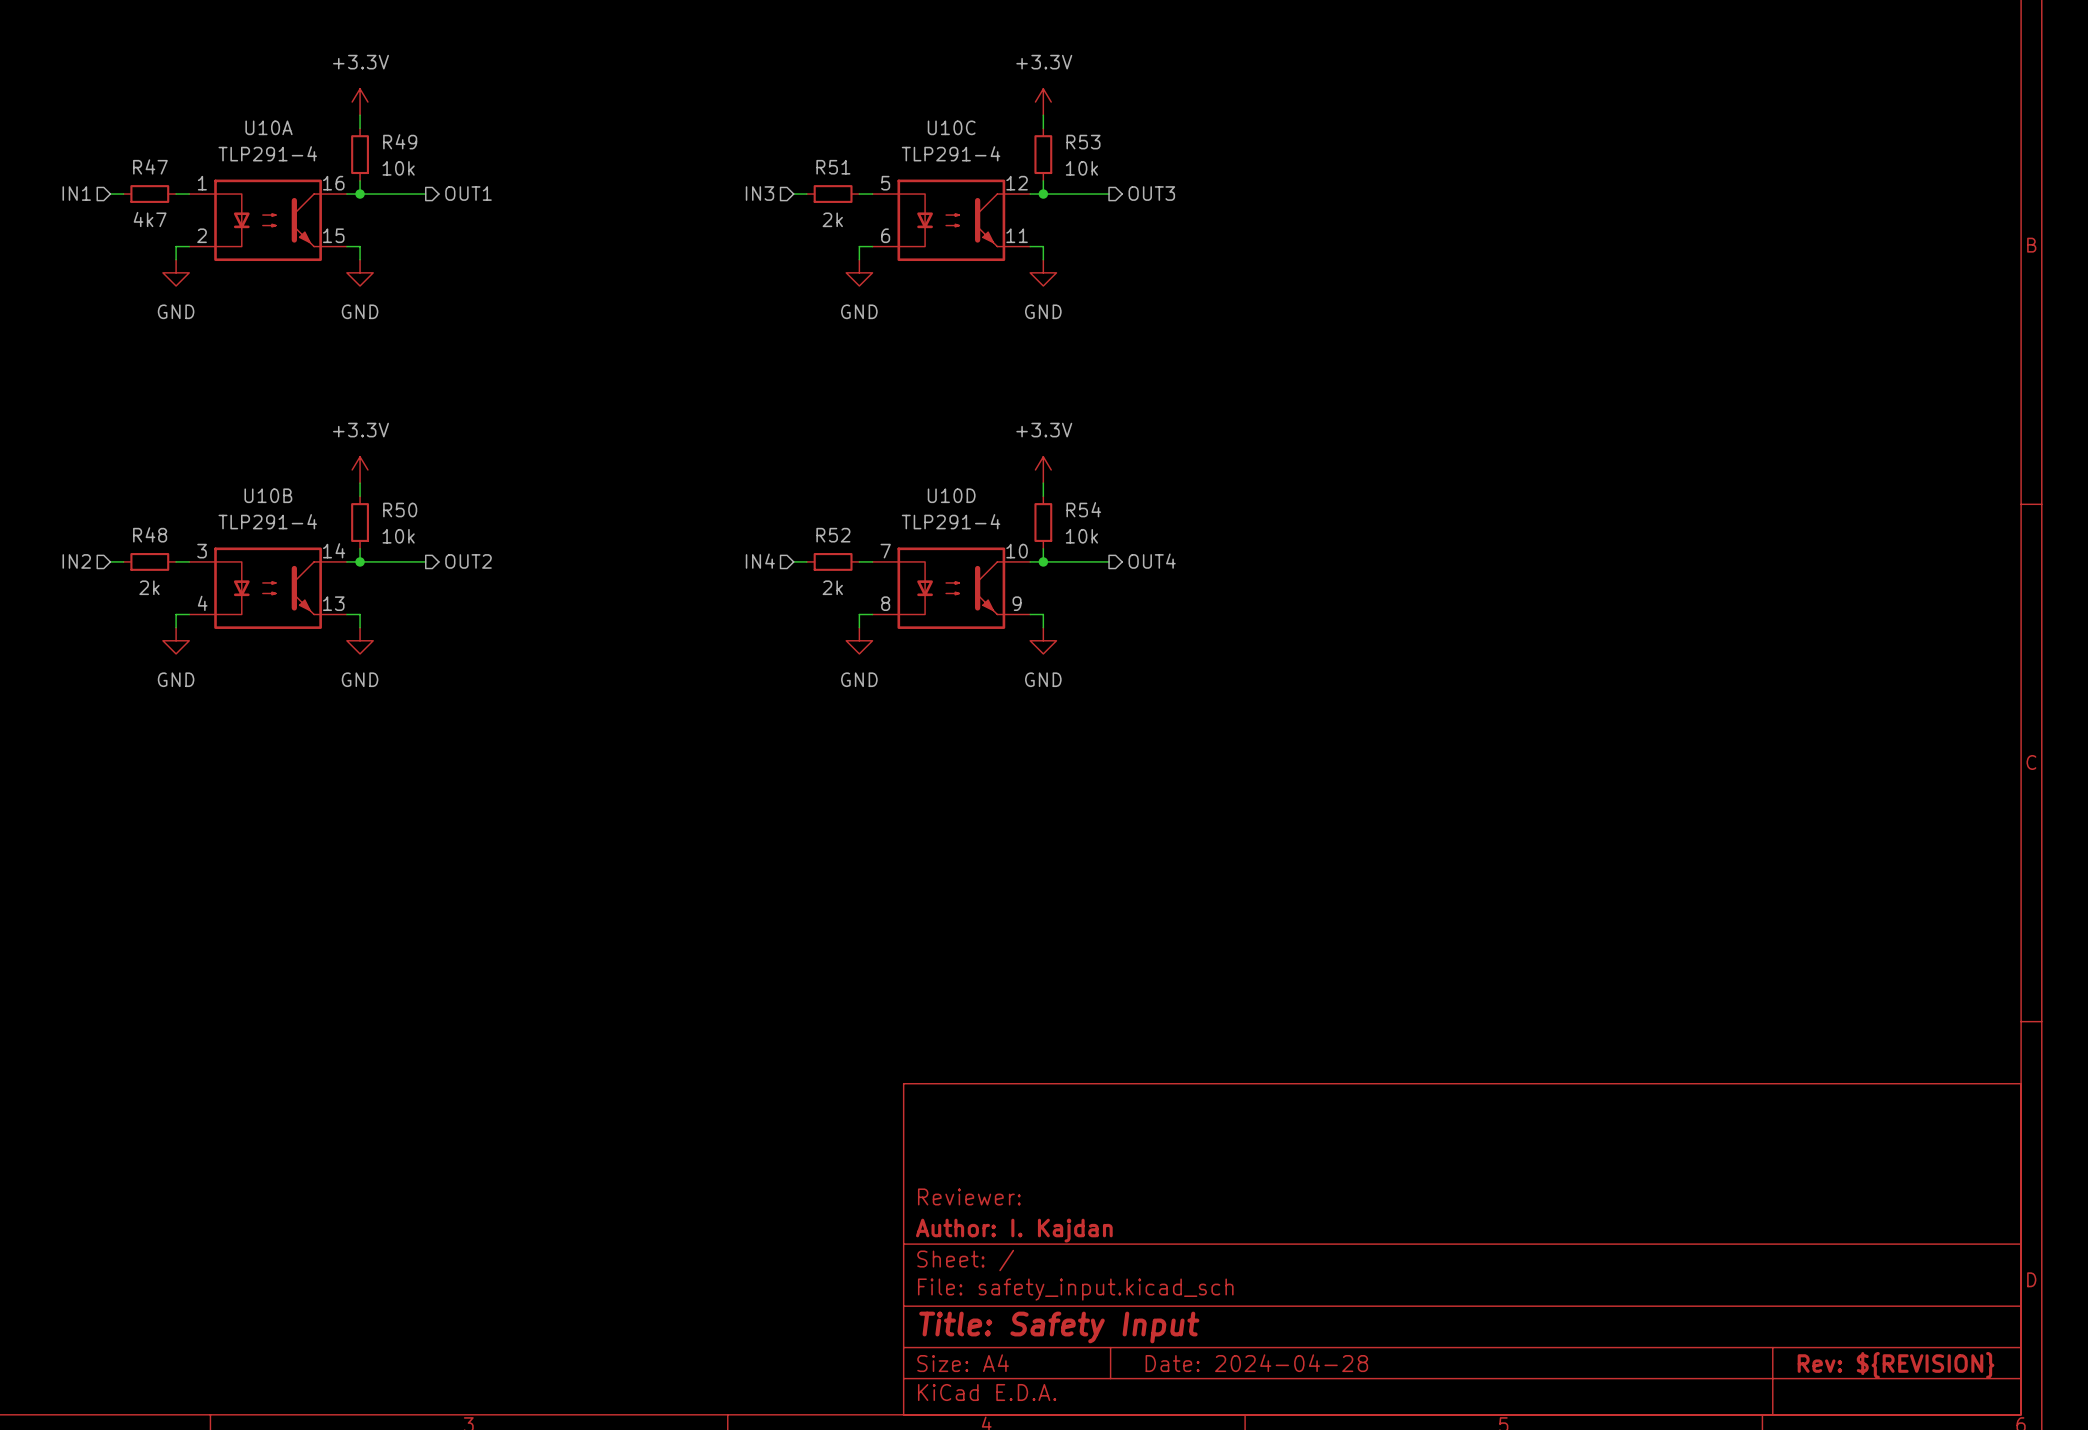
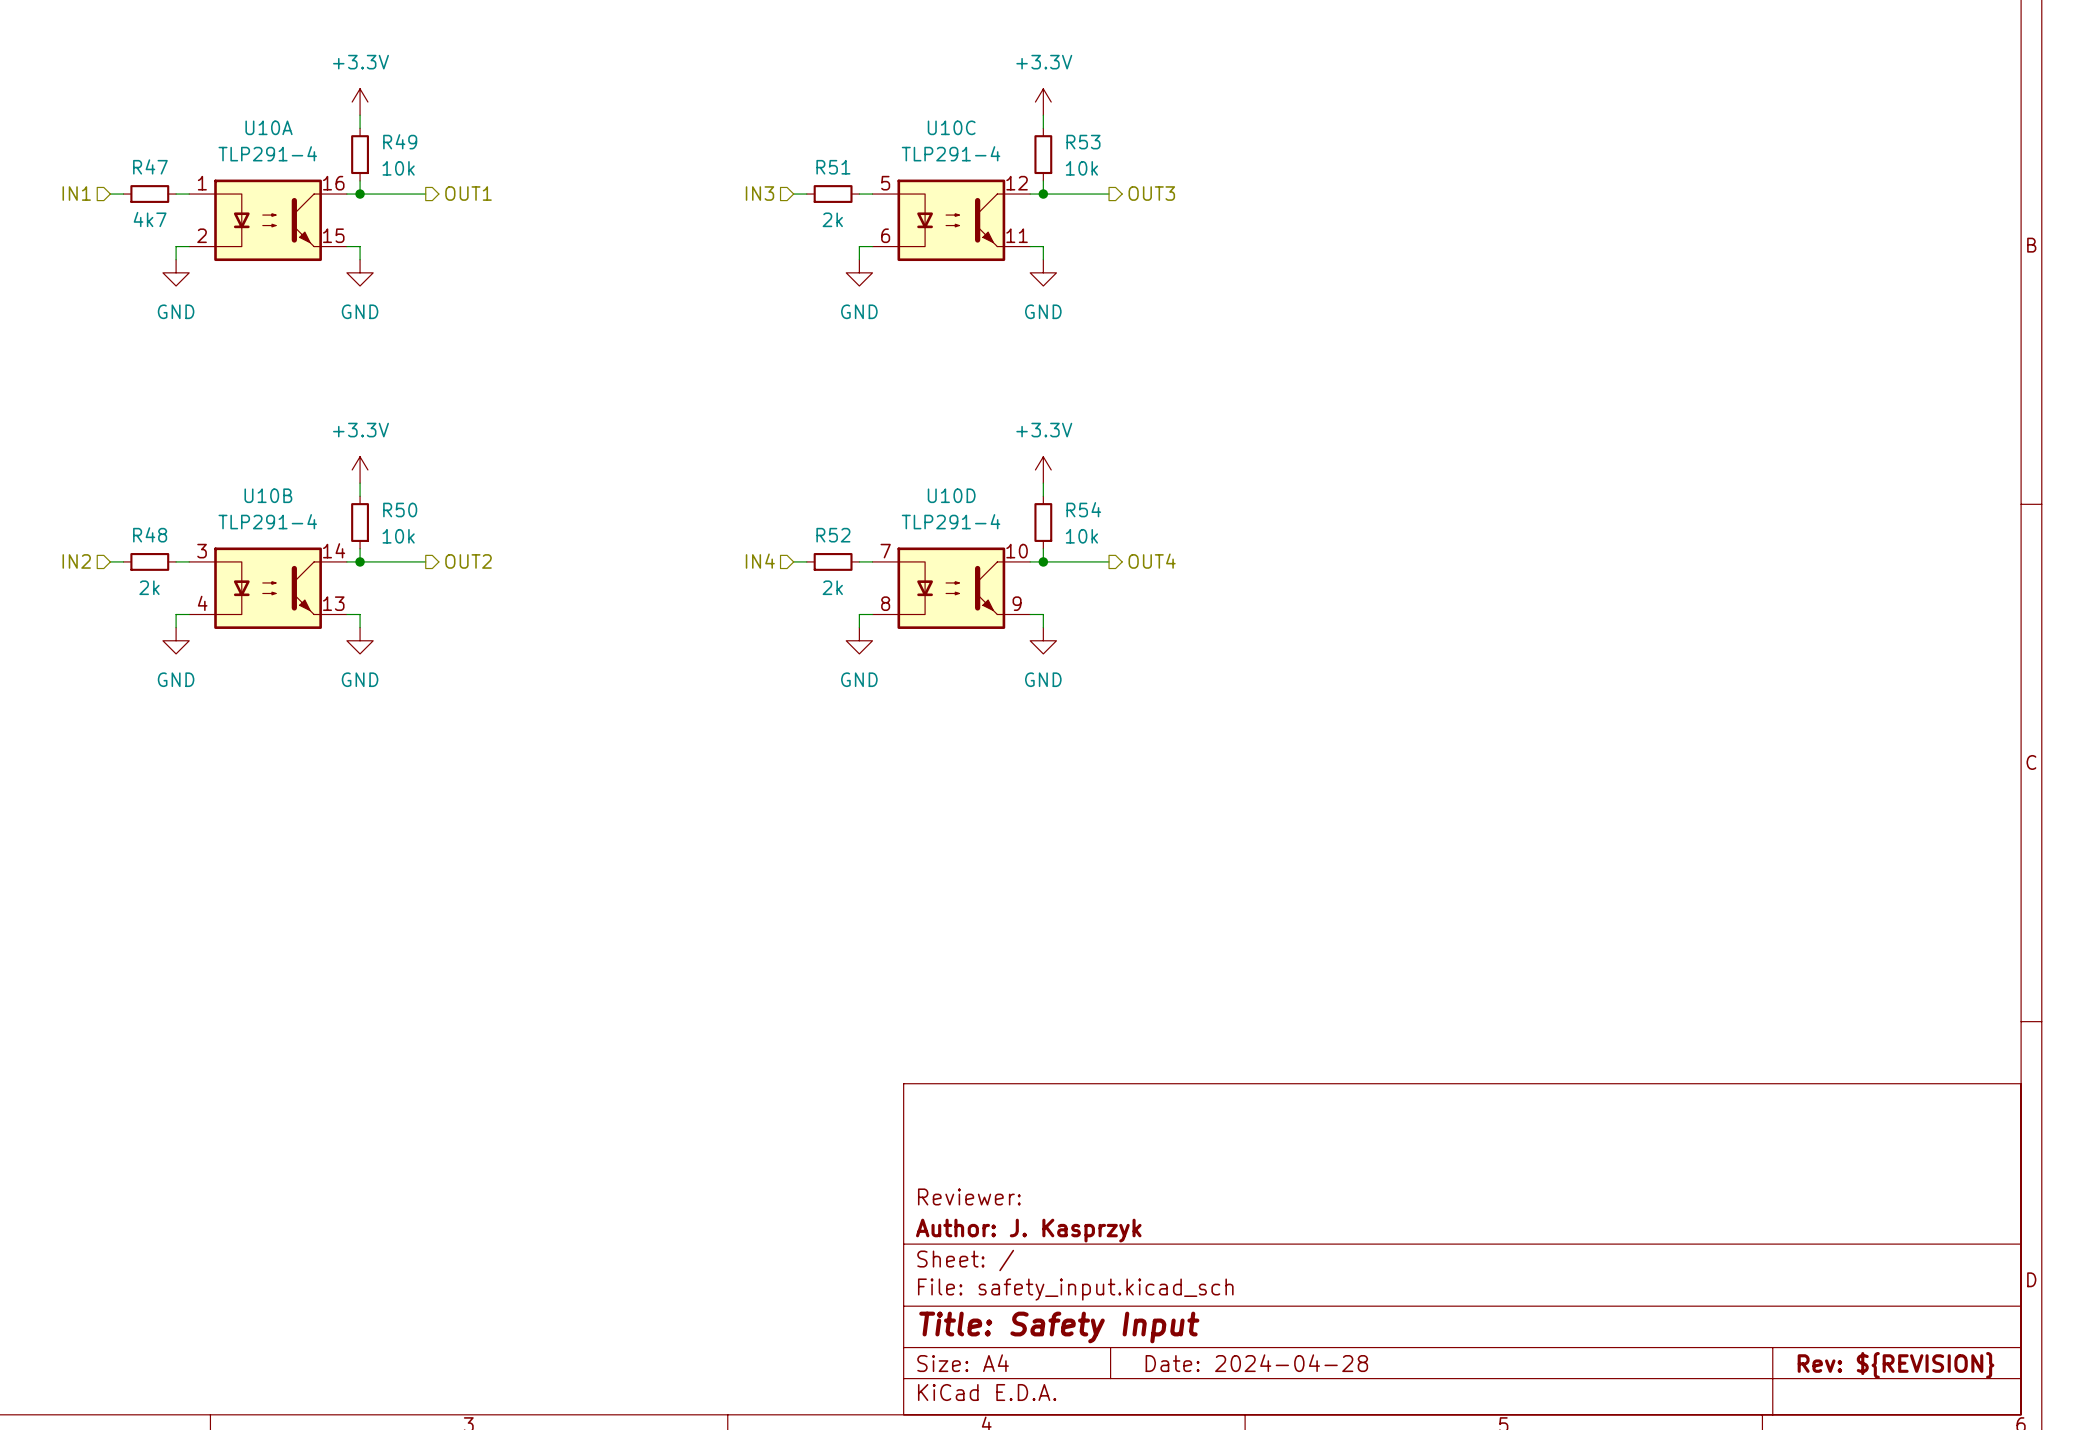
title block: Author: I. Kajdan (1014, 1230) -> Author: J. Kasprzyk (1028, 1230)

